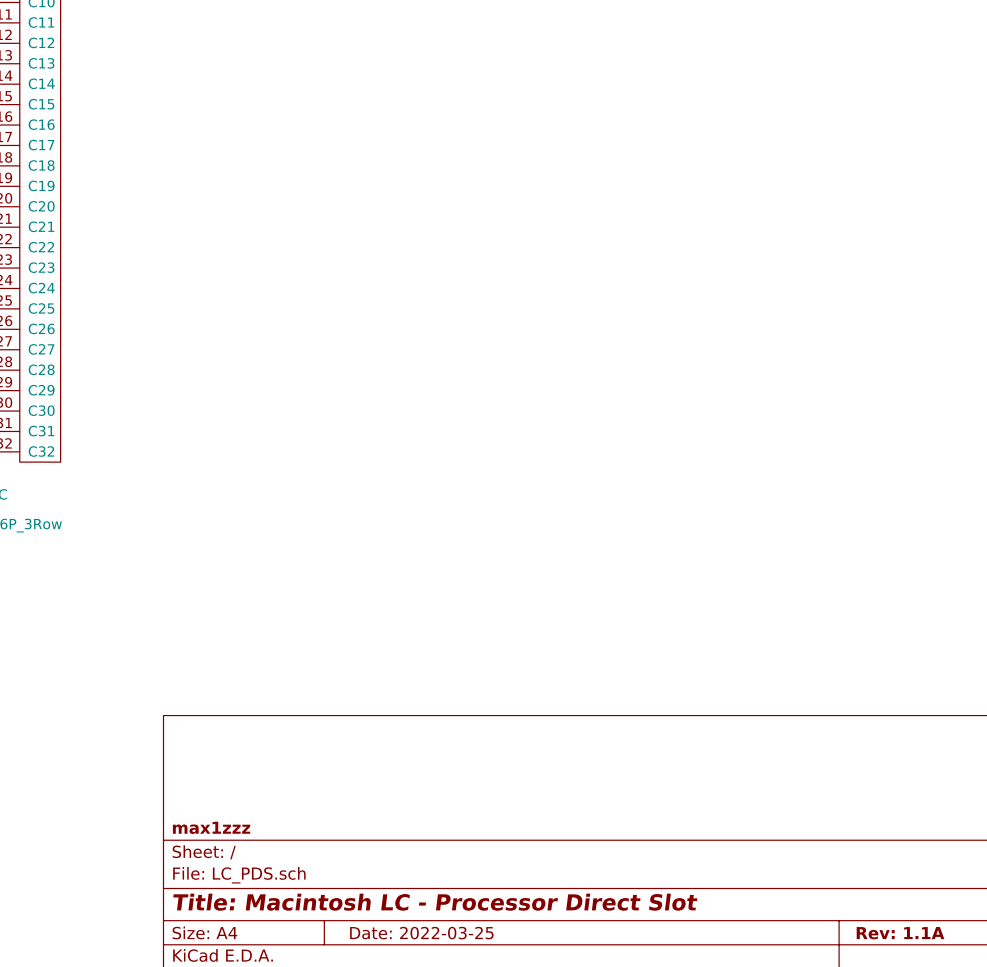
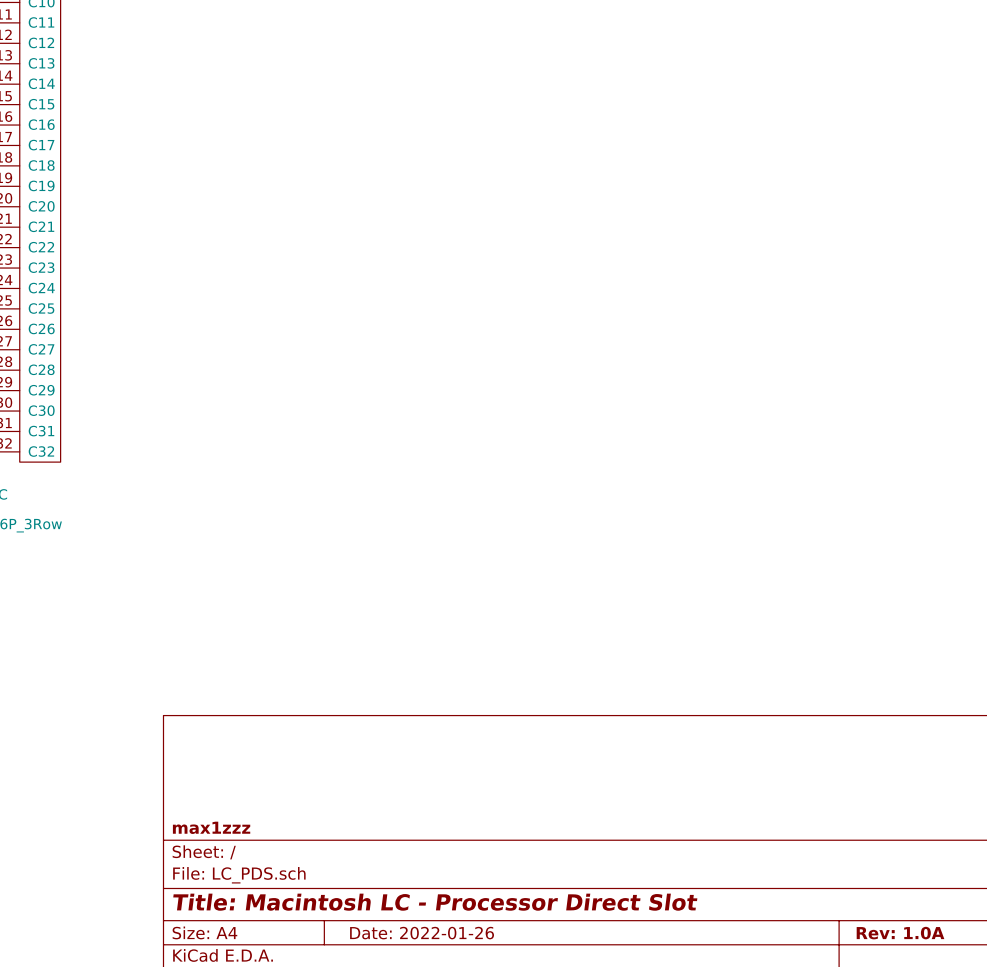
title block: Date: 2022-03-25 (421, 933) -> Date: 2022-01-26 (422, 933)
title block: Rev: 1.1A (900, 933) -> Rev: 1.0A (900, 933)

